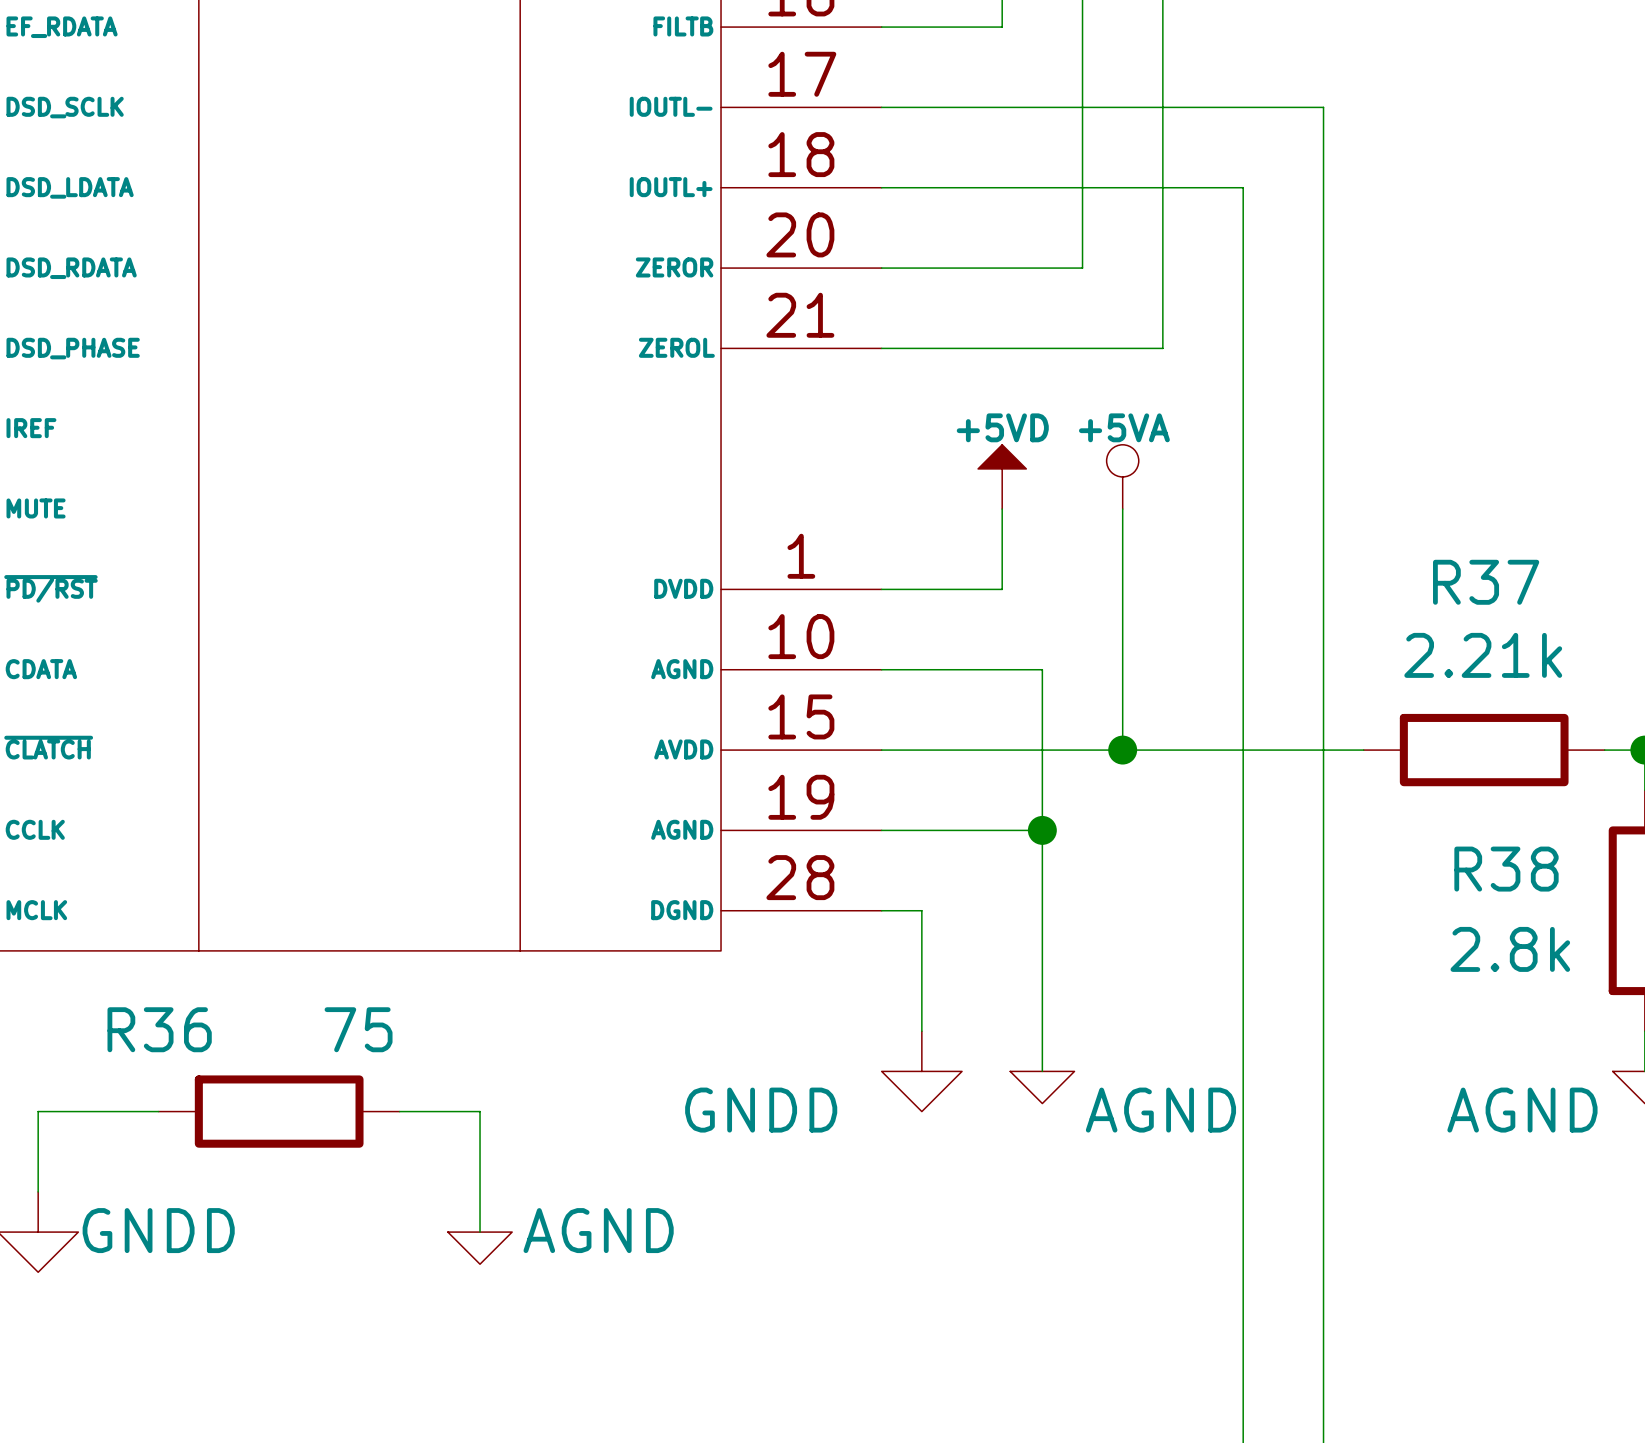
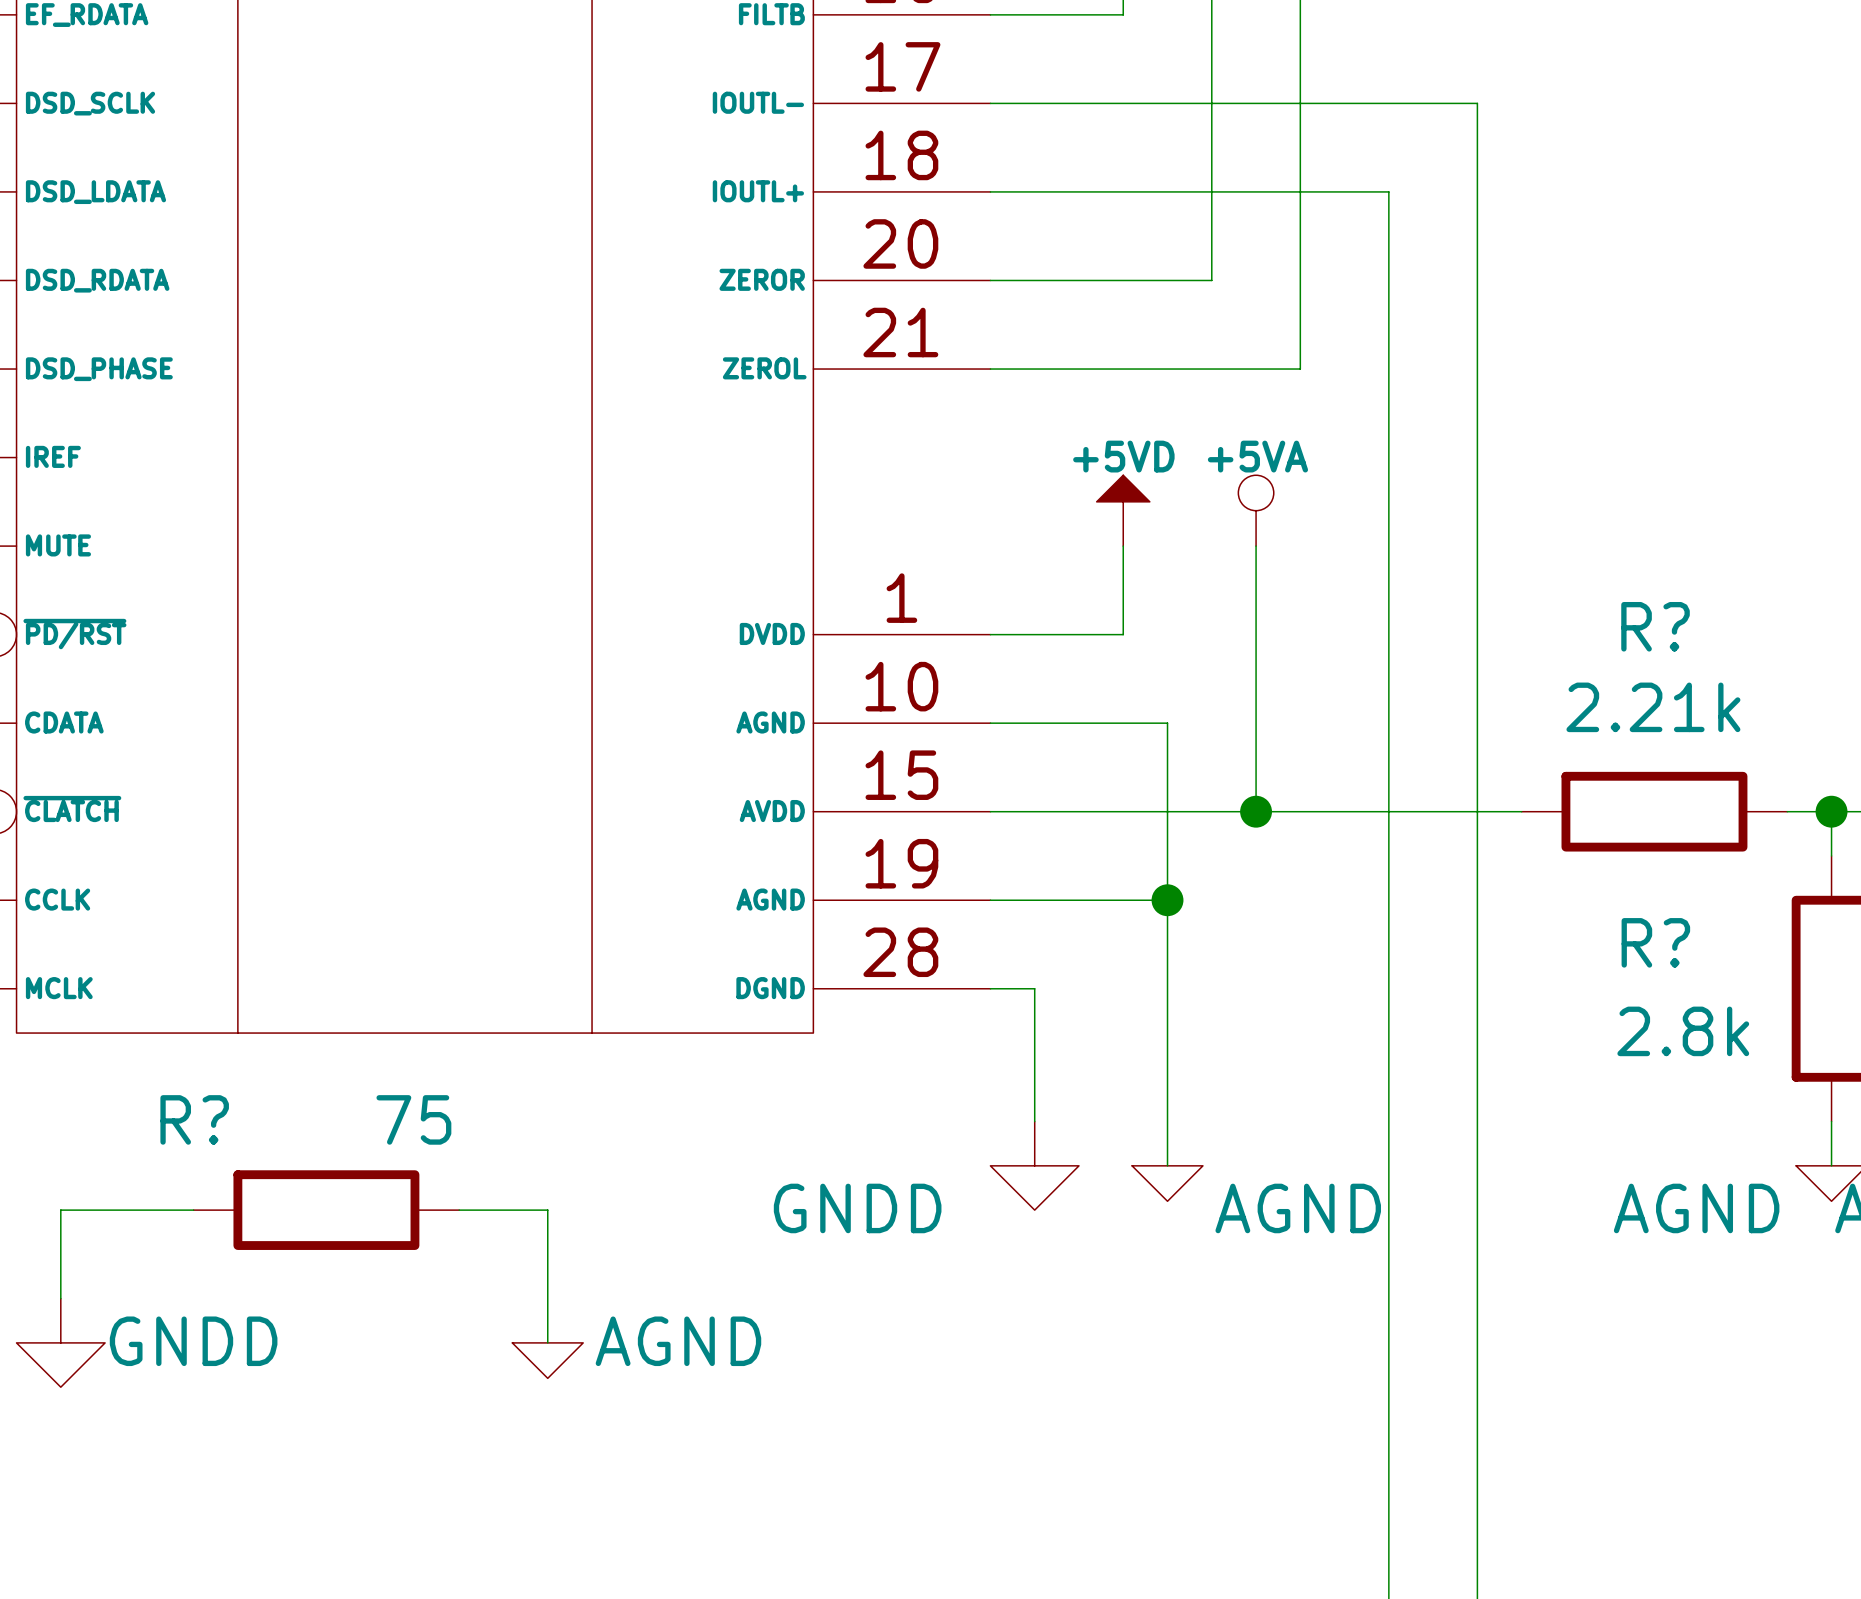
R37 name: R37 (1486, 582) -> R? (1655, 626)
R38 name: R38 (1506, 869) -> R? (1655, 942)
R36 name: R36 (159, 1029) -> R? (194, 1119)

